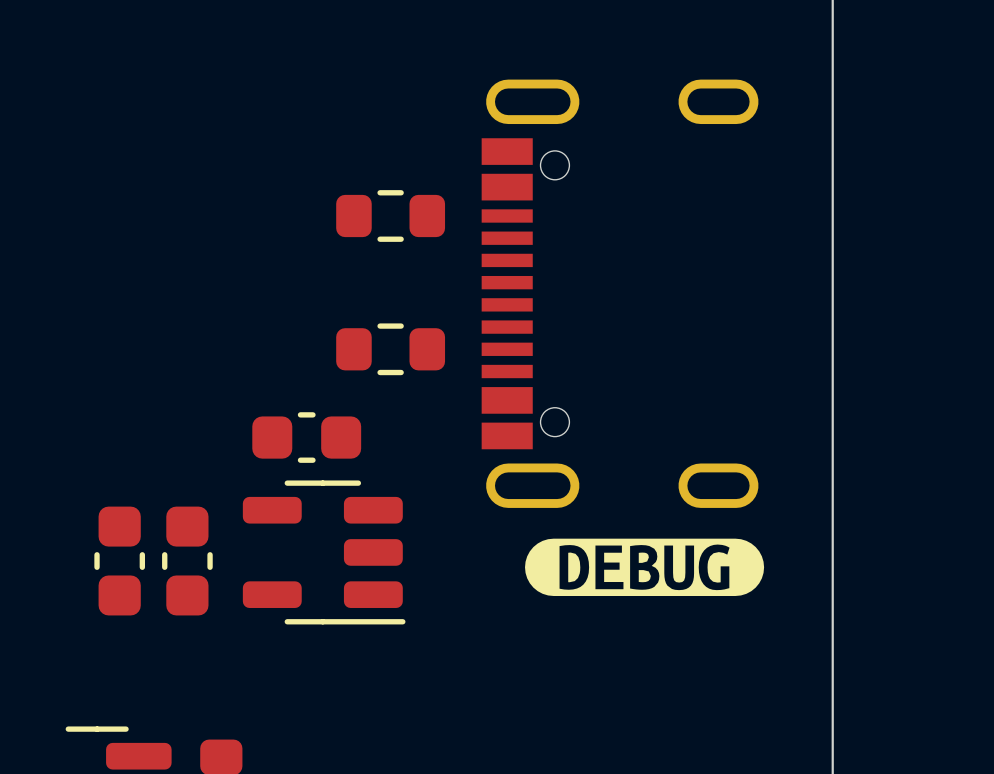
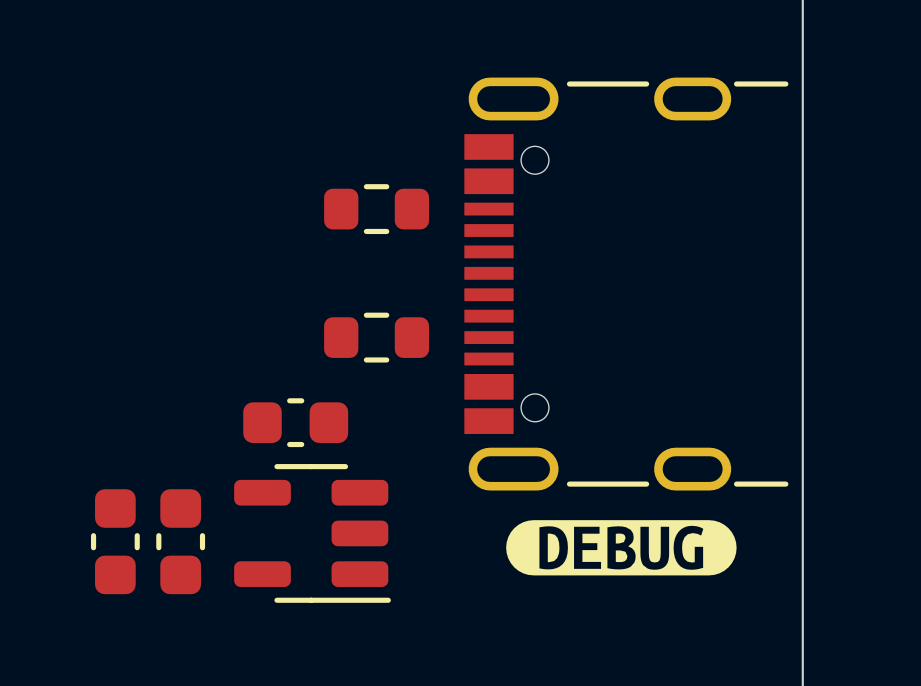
part footprint: [481, 79, 759, 508] -> [464, 77, 789, 491]

